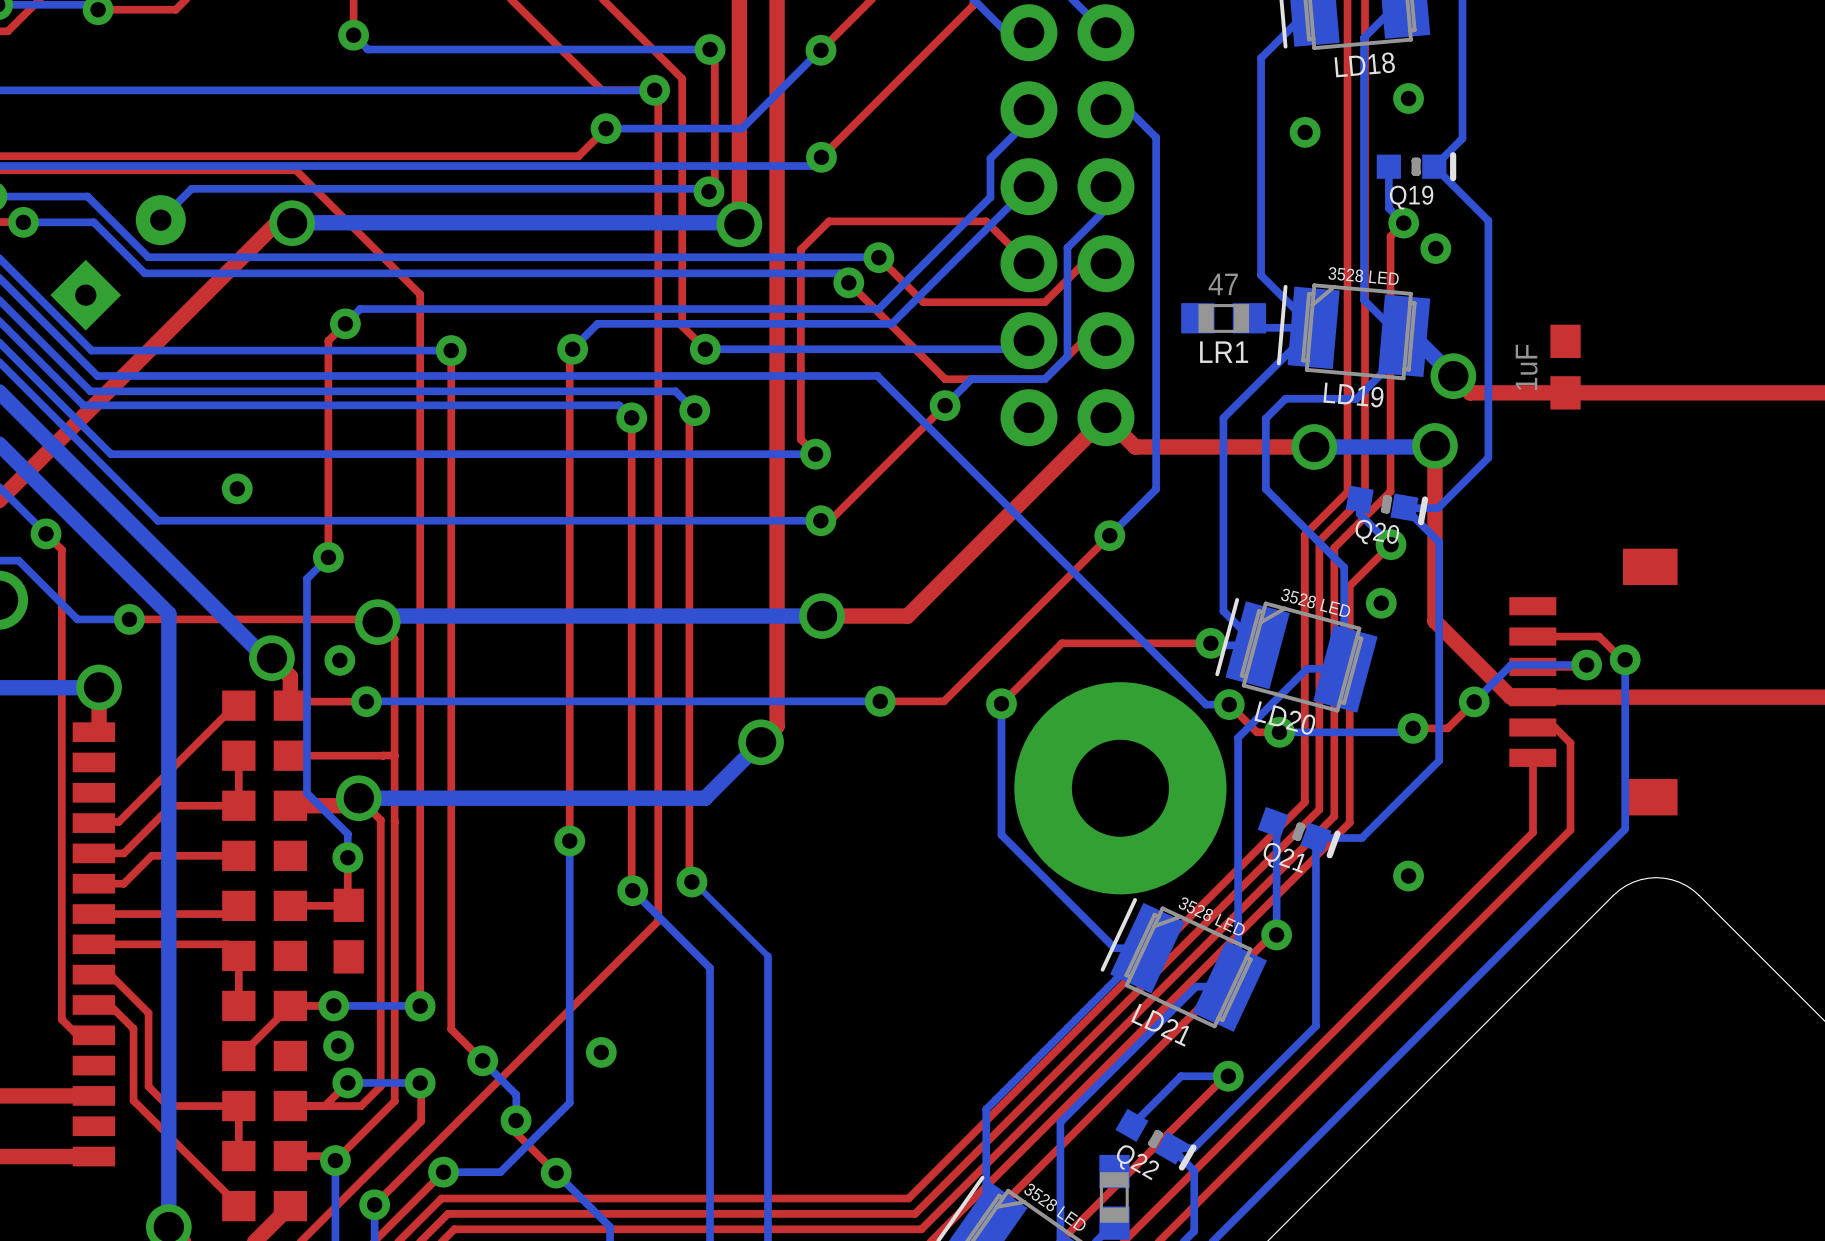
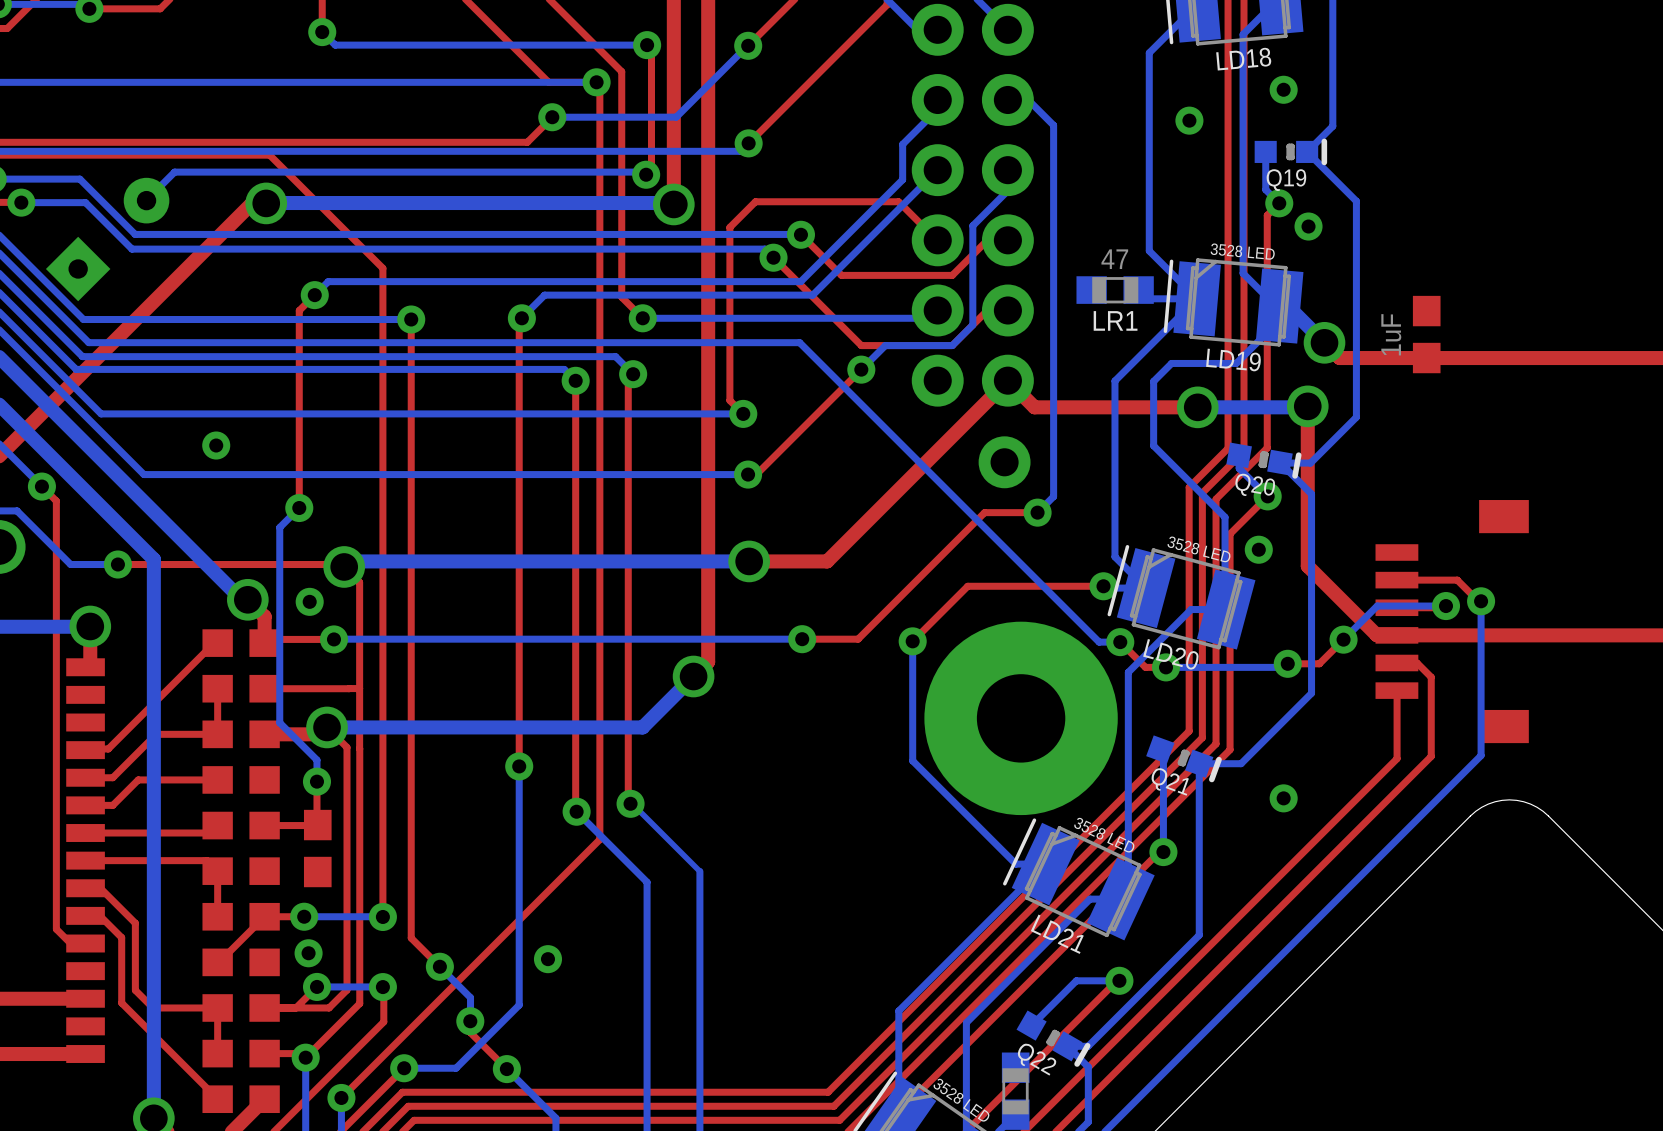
bottom track: (1156, 489) (1109, 535) -> (1053, 445) (1053, 496) (1037, 512)
part: none -> (1004, 462)
top track: (1109, 535) (944, 701) (941, 701) -> (1037, 512) (984, 512) (858, 639)
via position: (1109, 535) -> (1037, 512)

